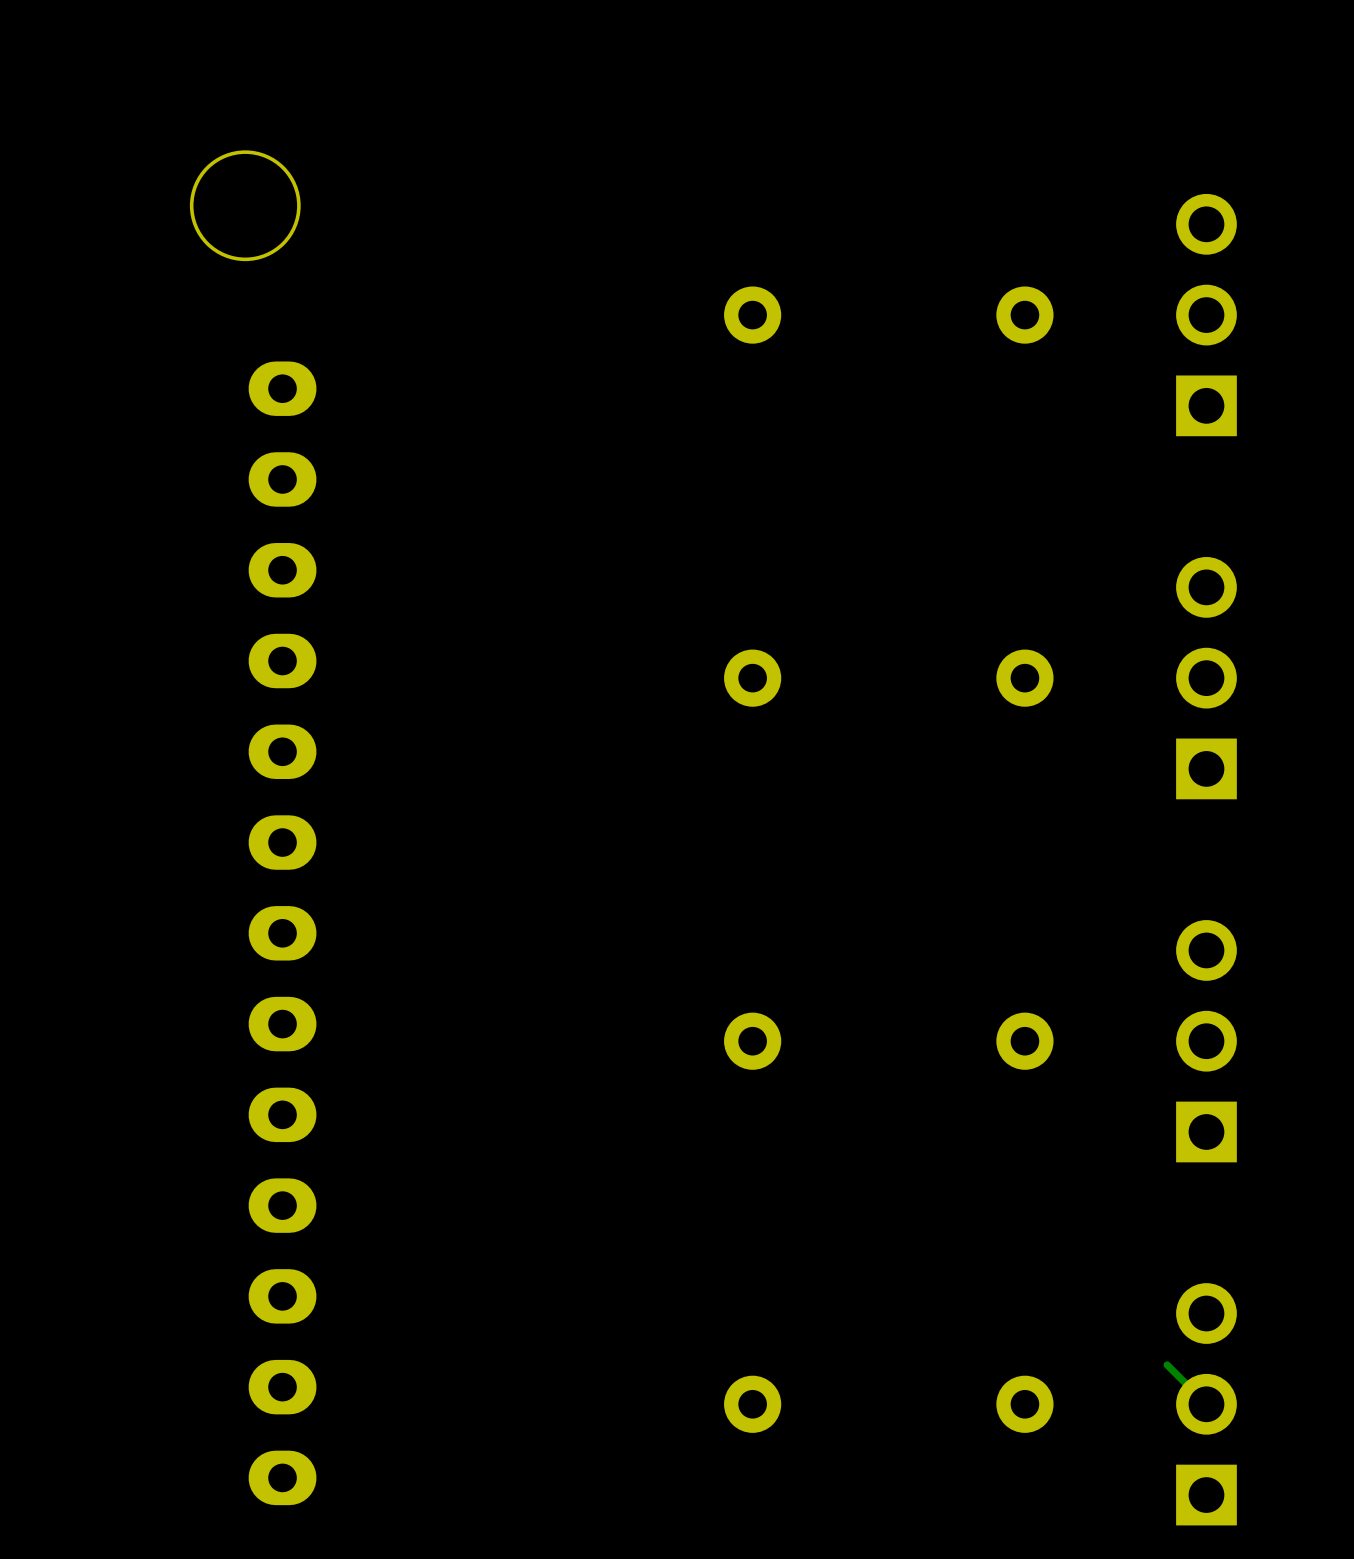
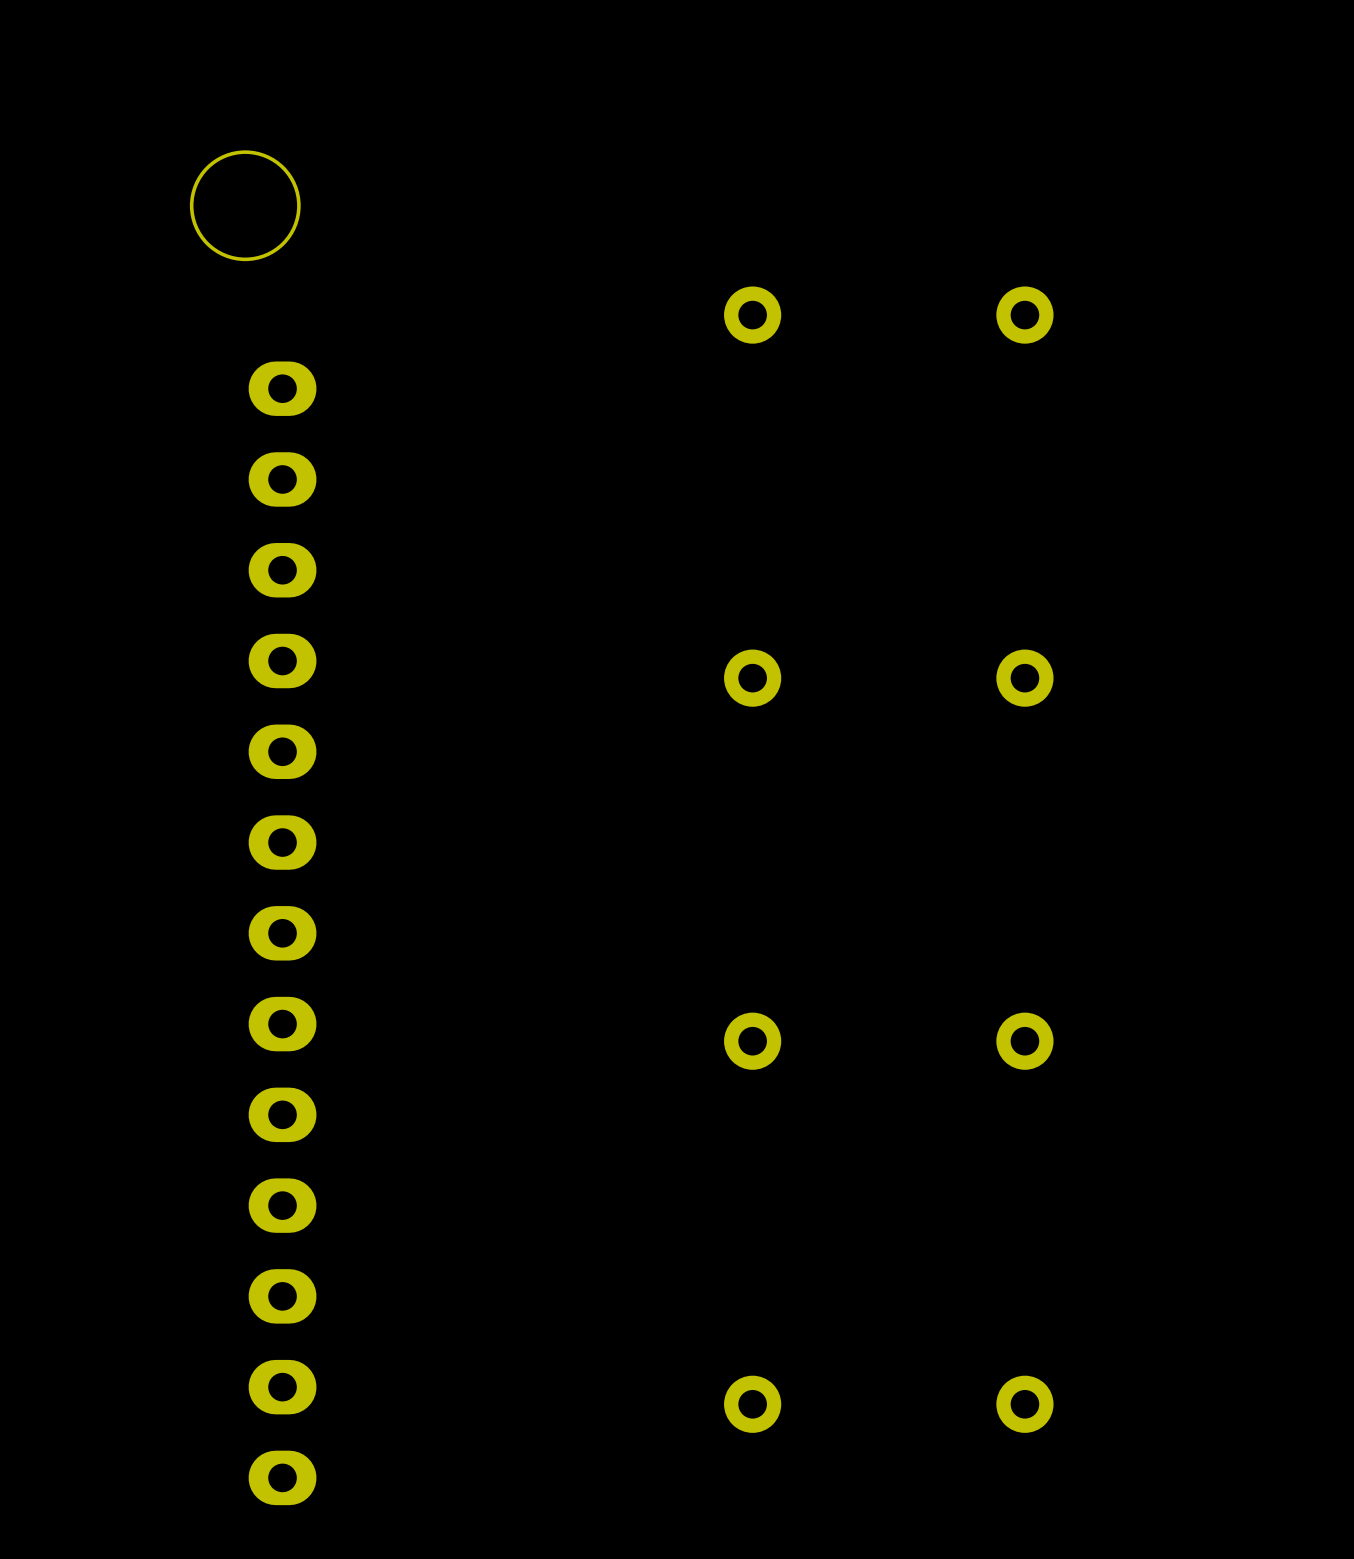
part: (1206, 315) -> none
part: (1206, 678) -> none
part: (1206, 1041) -> none
track: (1167, 1364) (1206, 1404) -> none
part: (1206, 1404) -> none

